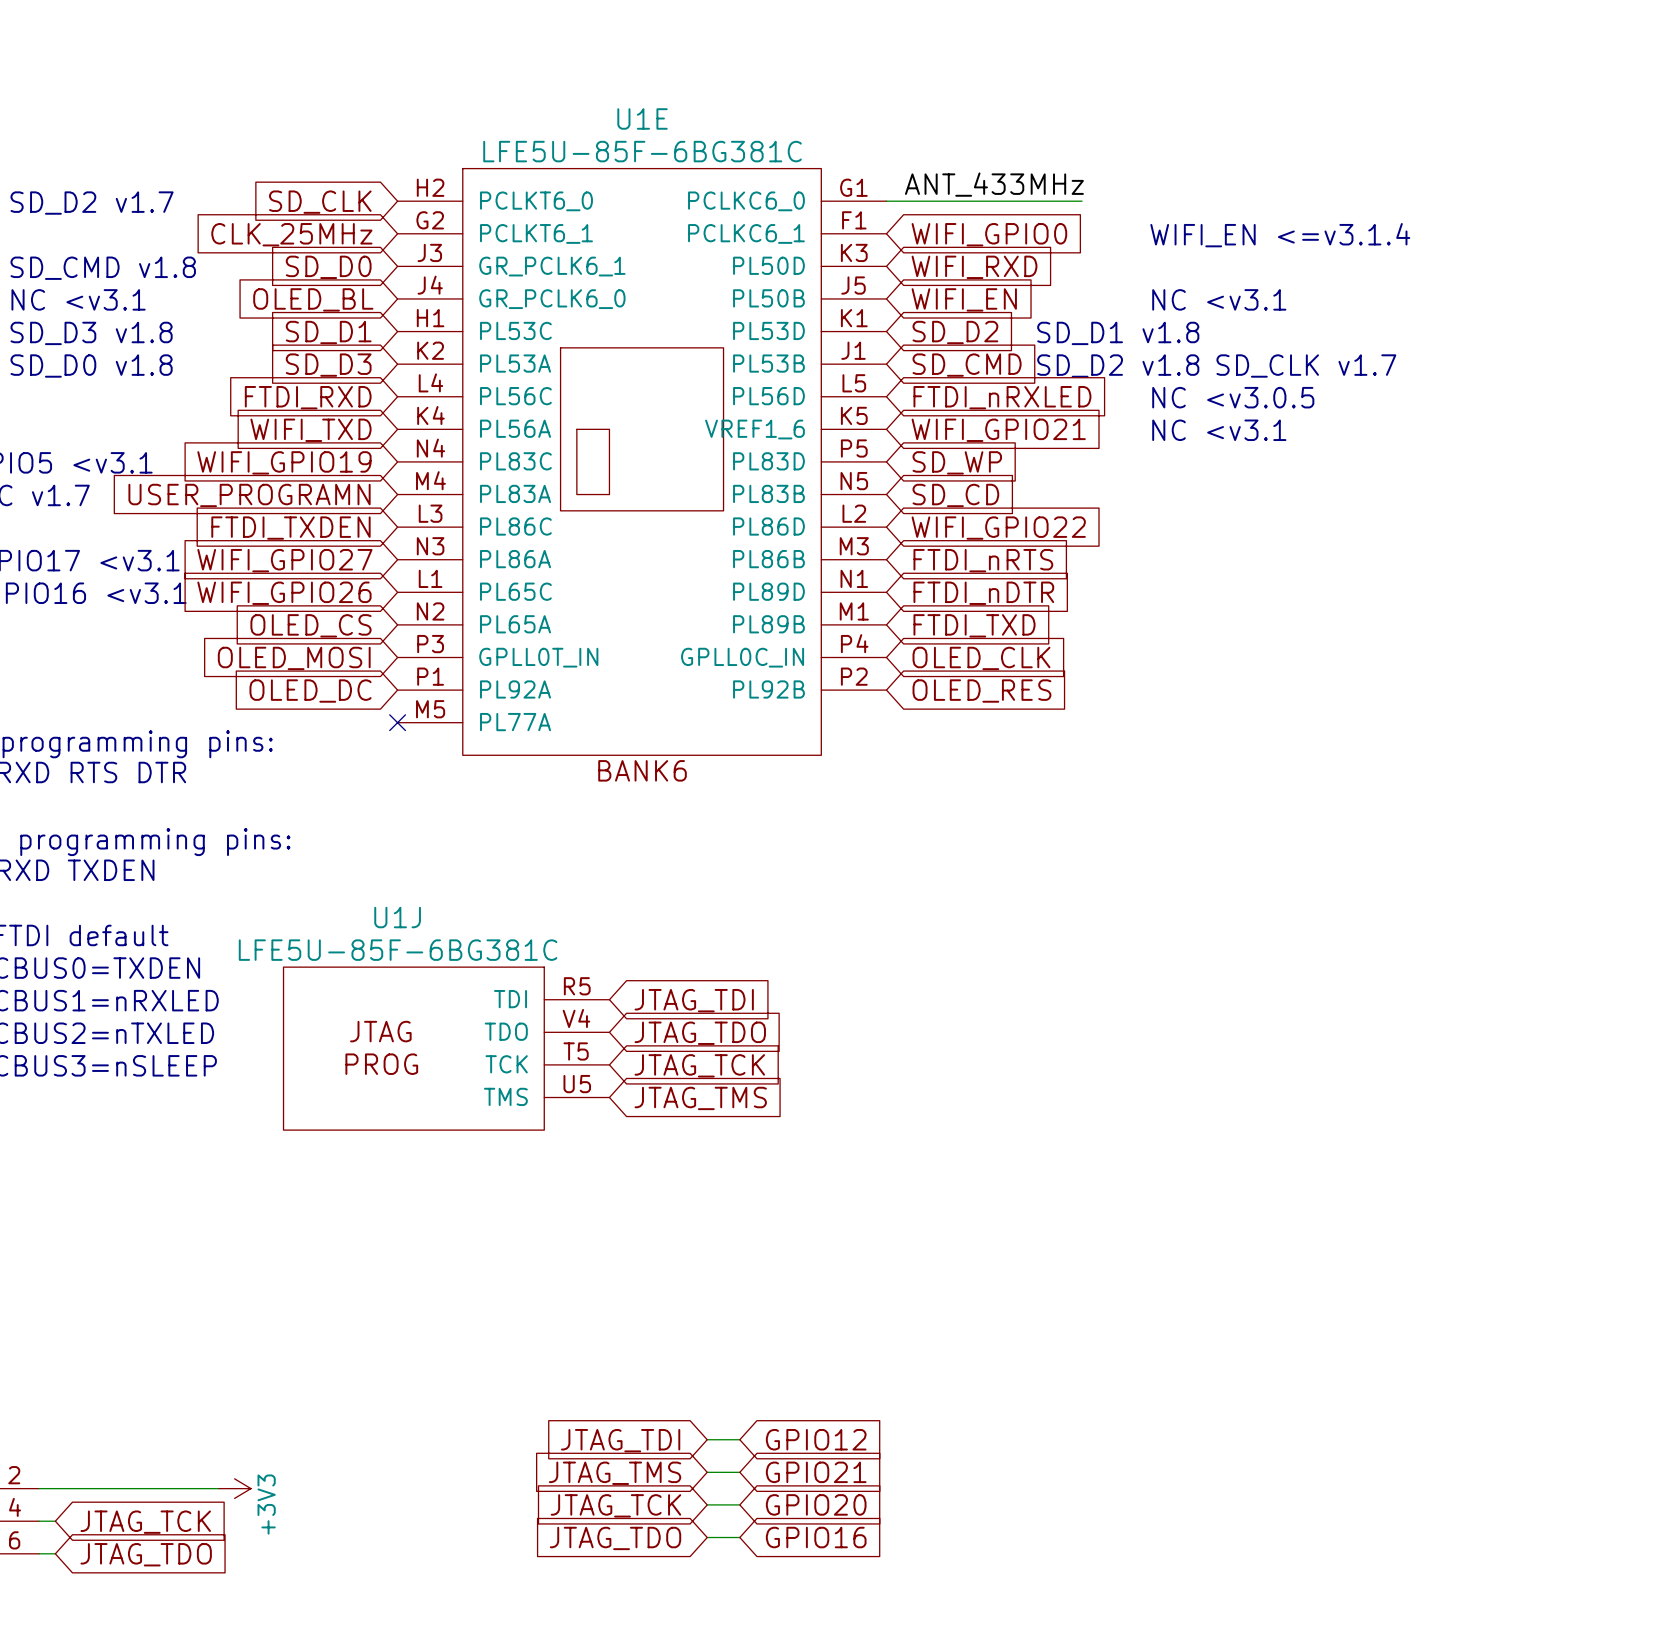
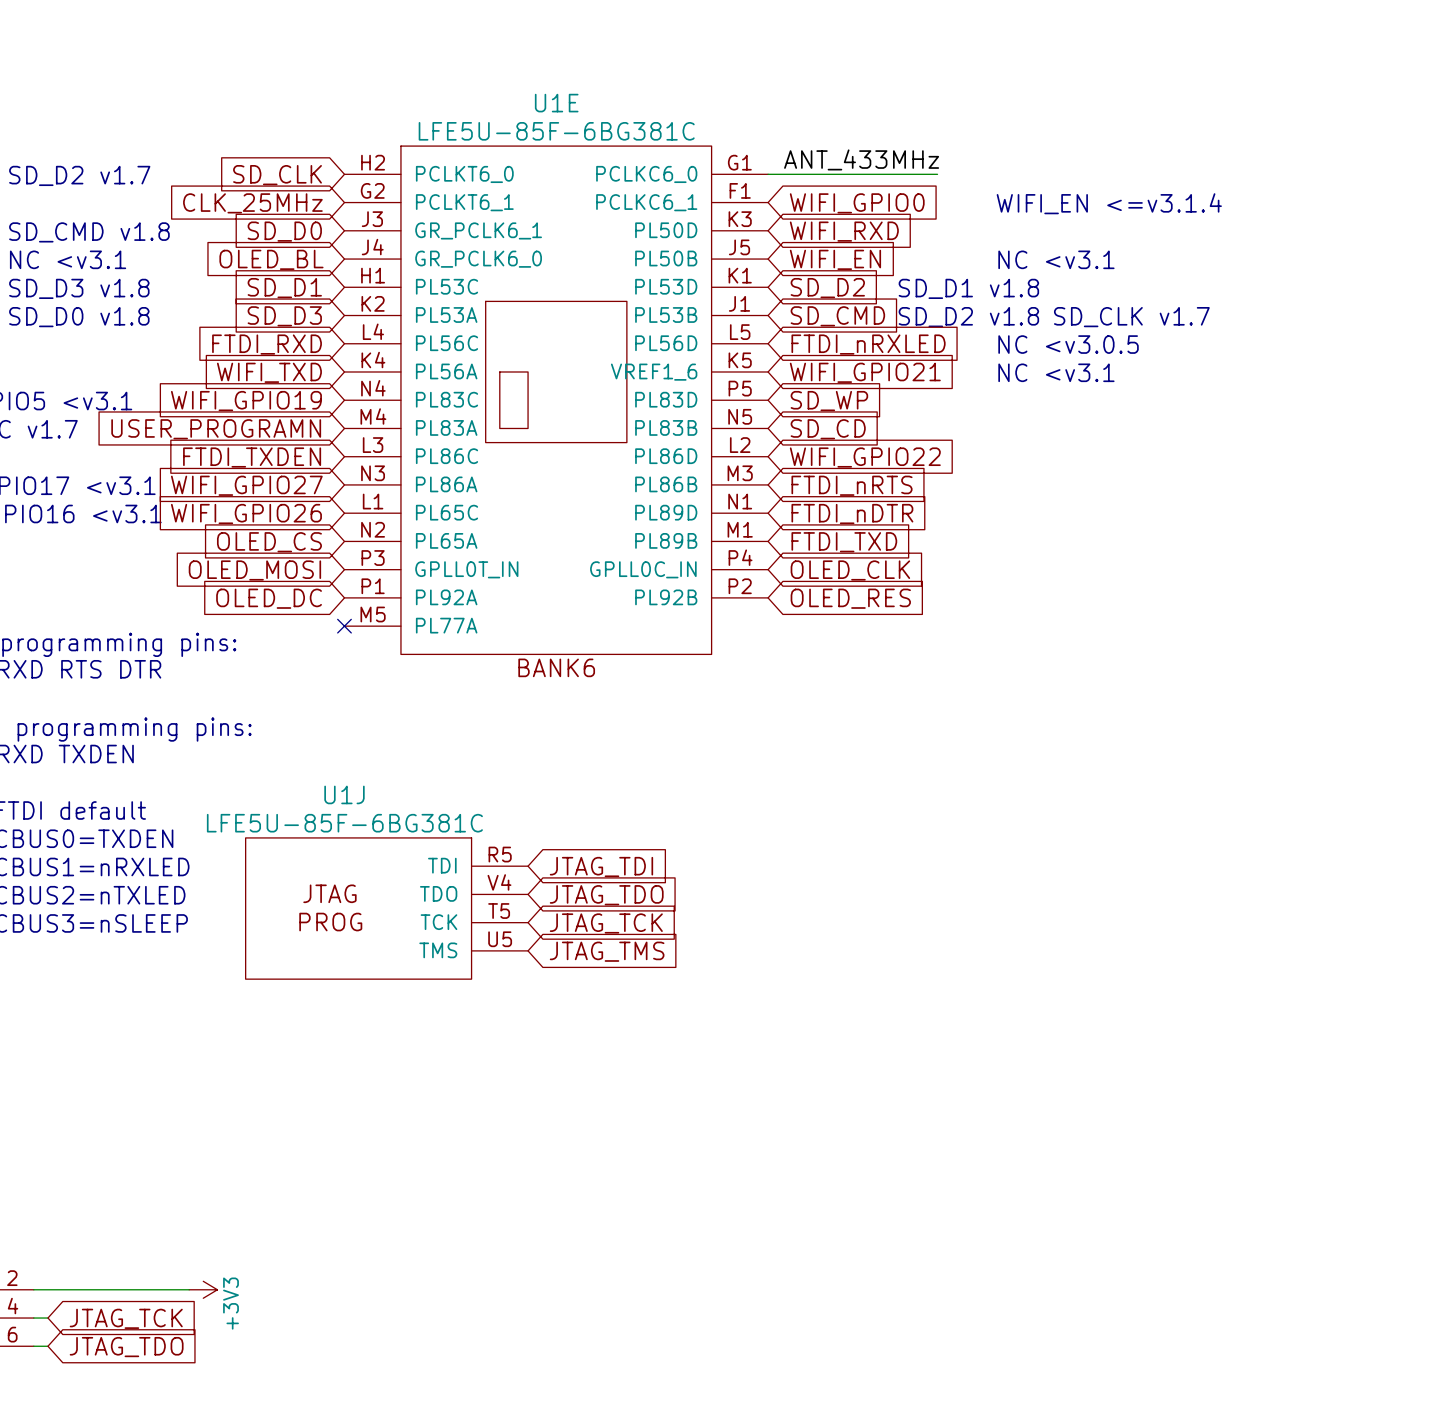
wire: (707, 1439) (739, 1439) -> none
global label: GPIO12 (816, 1439) -> none
global label: JTAG_TDI (620, 1440) -> none
wire: (707, 1472) (739, 1472) -> none
global label: GPIO21 (816, 1472) -> none
global label: JTAG_TMS (615, 1473) -> none
wire: (707, 1504) (739, 1504) -> none
global label: GPIO20 (816, 1504) -> none
global label: JTAG_TCK (615, 1505) -> none
wire: (707, 1537) (739, 1537) -> none
global label: GPIO16 (816, 1537) -> none
global label: JTAG_TDO (615, 1538) -> none

